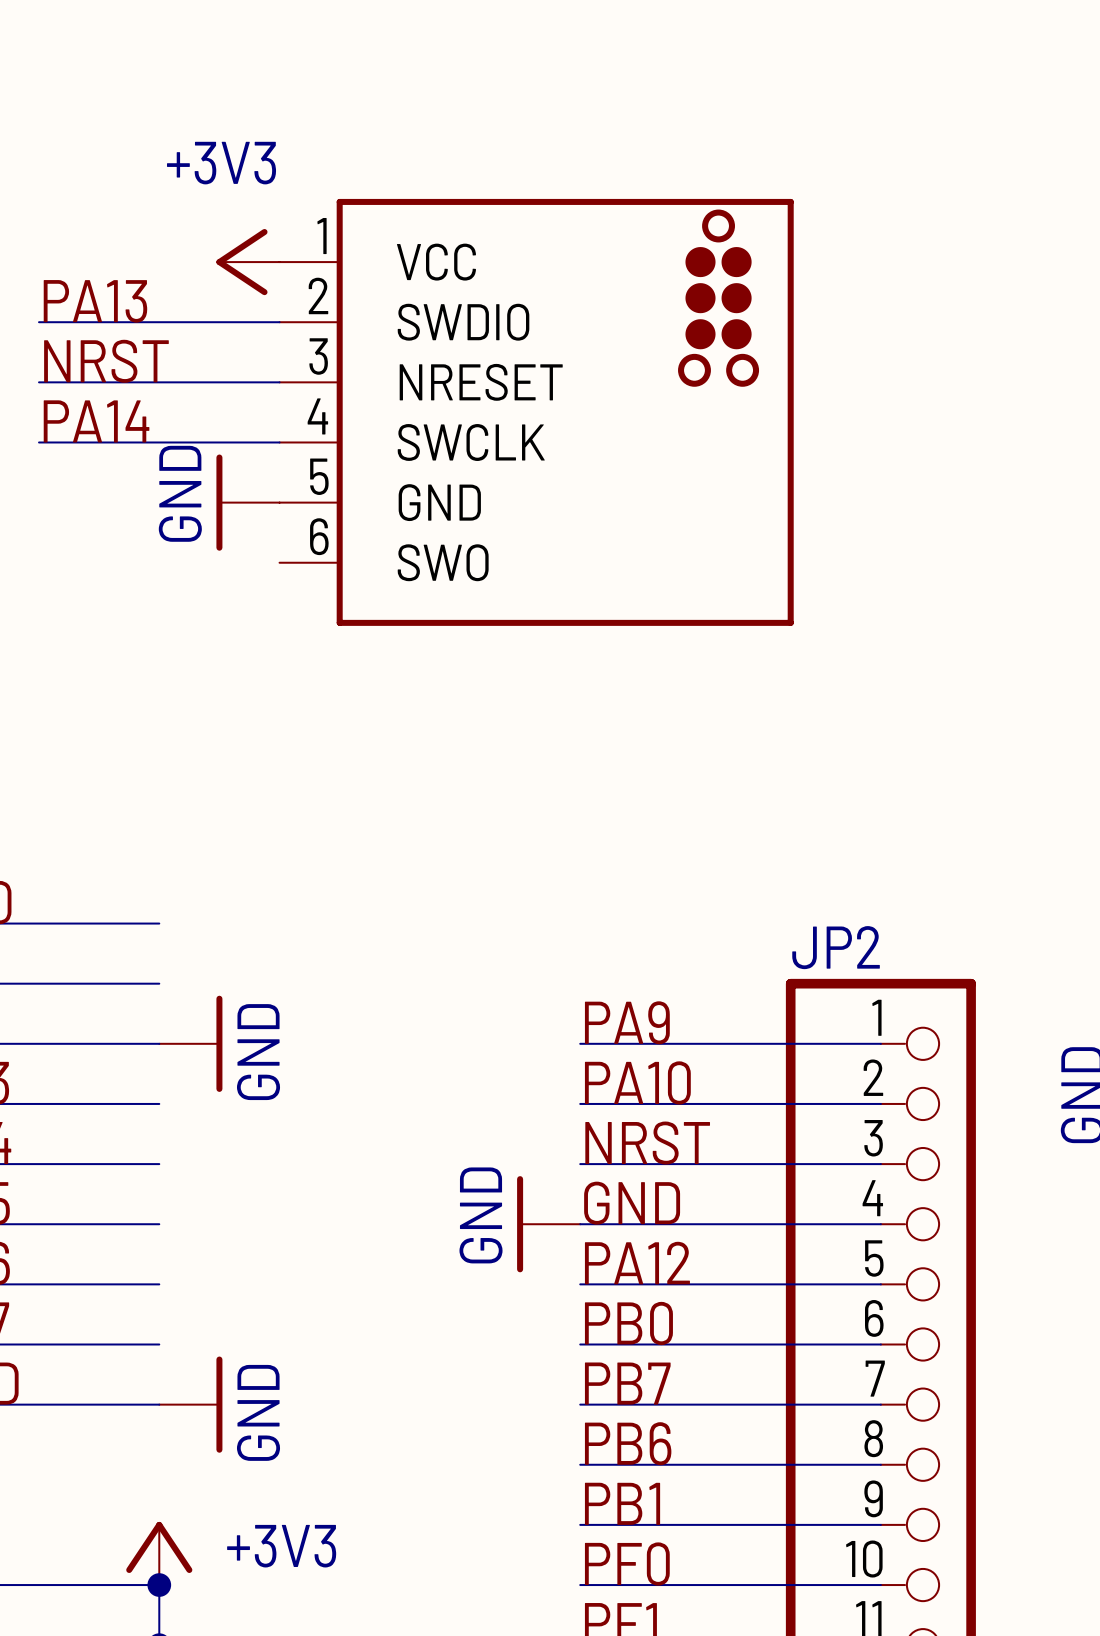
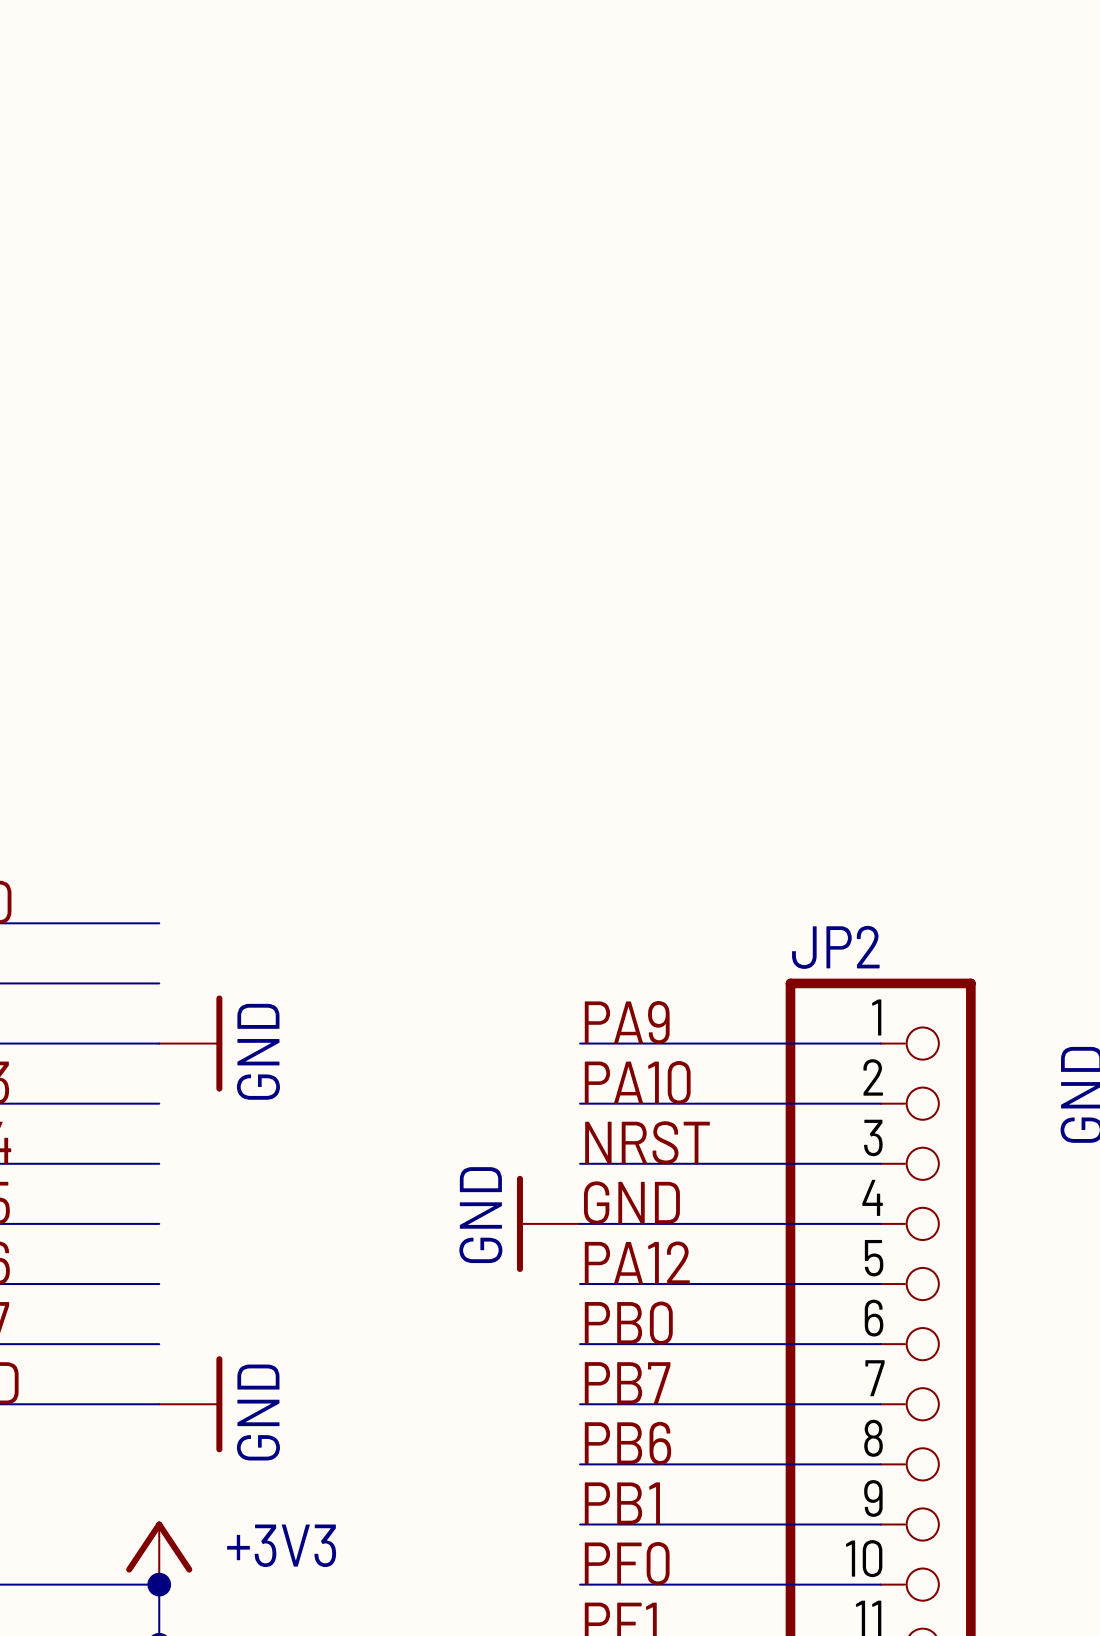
power symbol: +3V3 (247, 262) -> none
label: PA13 (95, 301) -> none
wire: (39, 322) (279, 322) -> none
label: NRST (106, 361) -> none
wire: (39, 382) (279, 382) -> none
part: (536, 412) -> none
label: PA14 (96, 421) -> none
wire: (39, 442) (279, 442) -> none
power symbol: GND (247, 502) -> none

